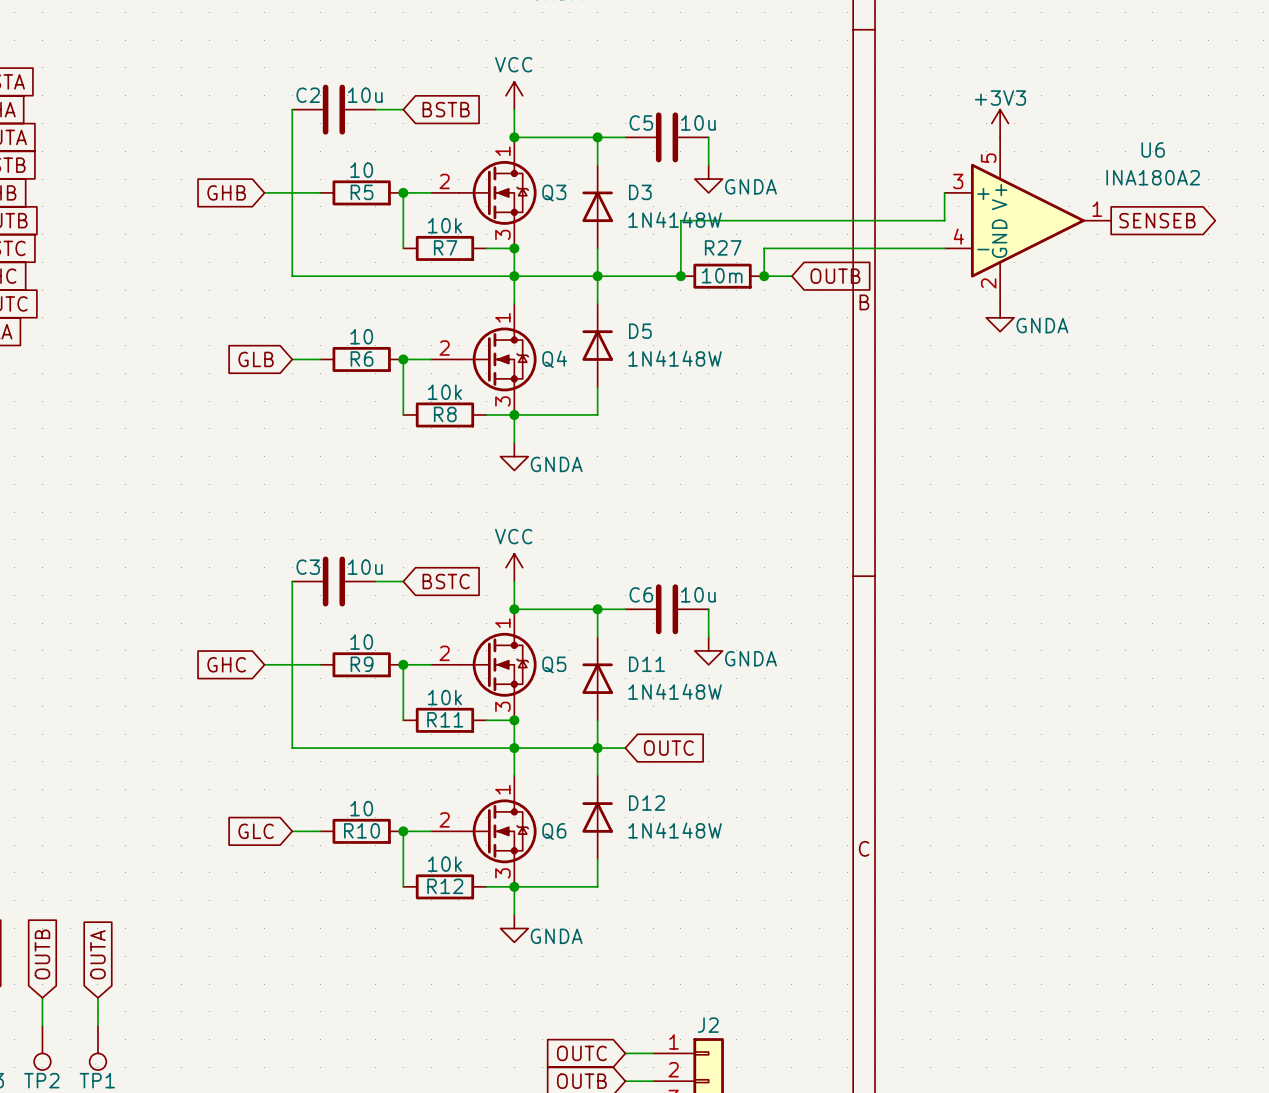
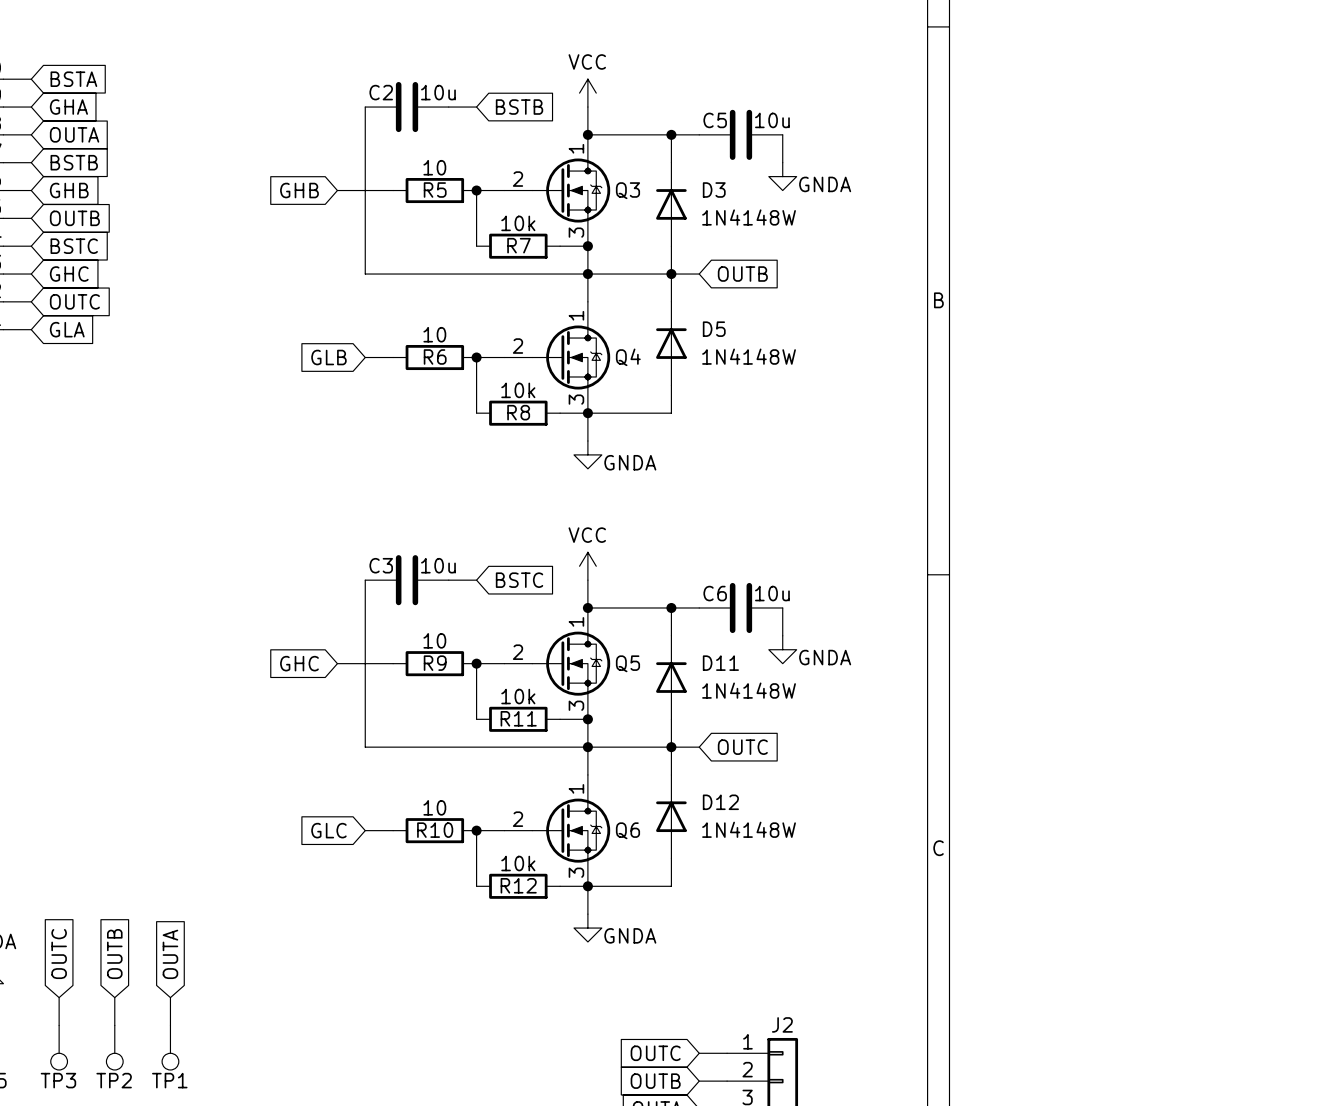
power symbol: +3V3 (1000, 123) -> none
wire: (944, 192) (944, 220) (680, 220) (680, 276) (625, 276) -> none
U6: INA180A2 (1027, 220) -> none
global label: SENSEB (1157, 220) -> none
wire: (944, 248) (764, 248) (764, 276) (791, 276) -> none
junction: (680, 276) -> none
R27: 10m (722, 276) -> none
junction: (764, 276) -> none
global label position: OUTB (835, 276) -> OUTB (742, 274)
power symbol: GNDA (1000, 317) -> none

